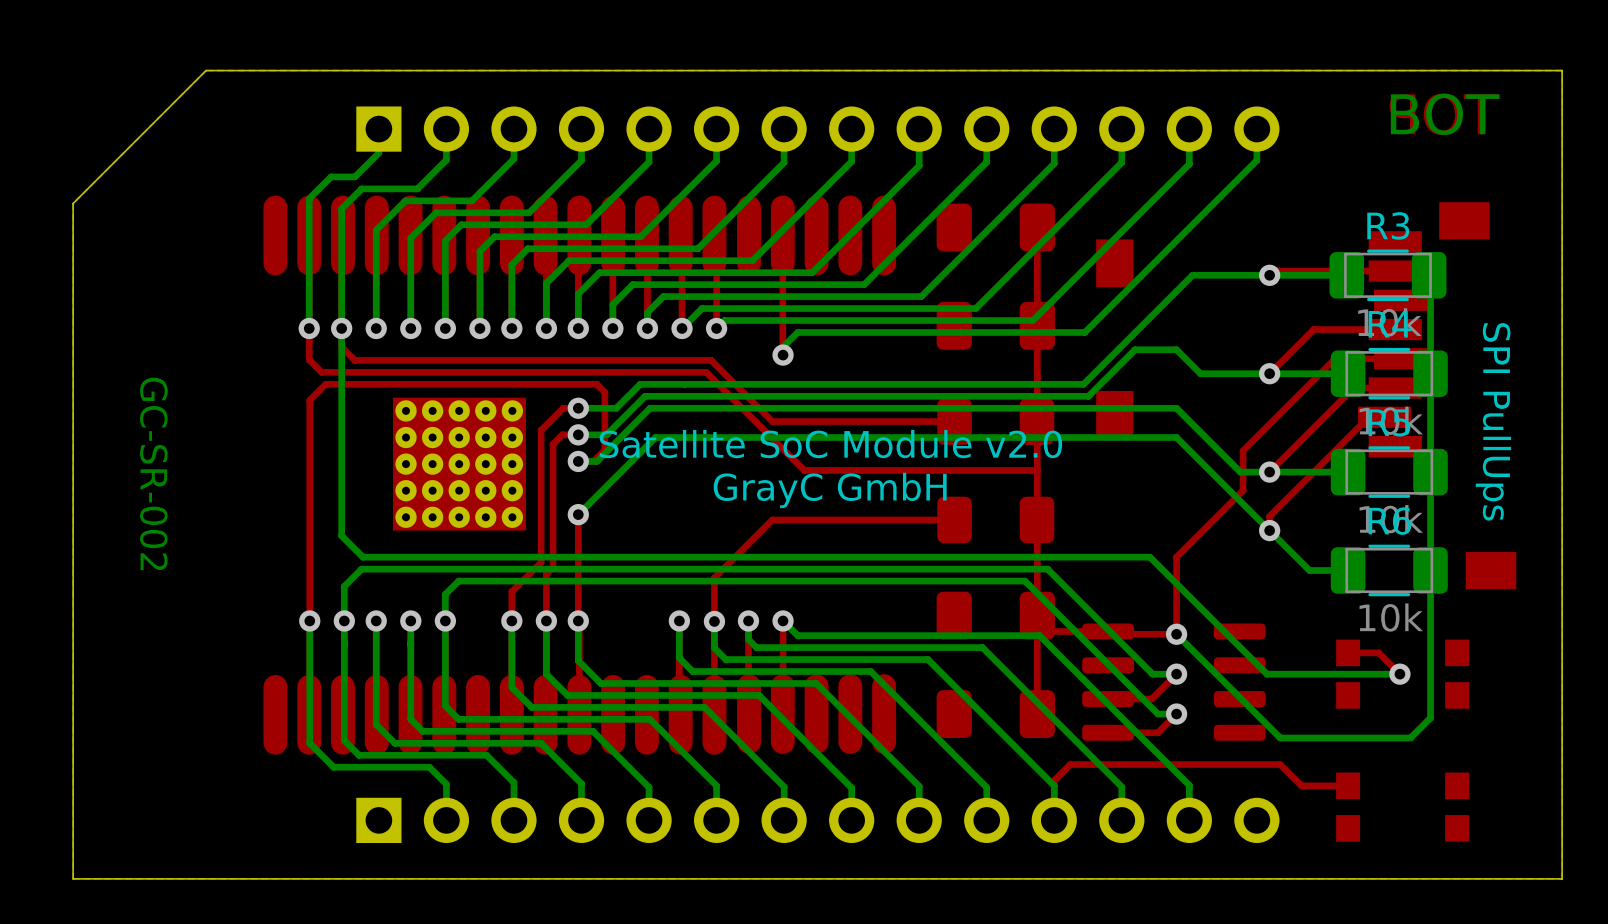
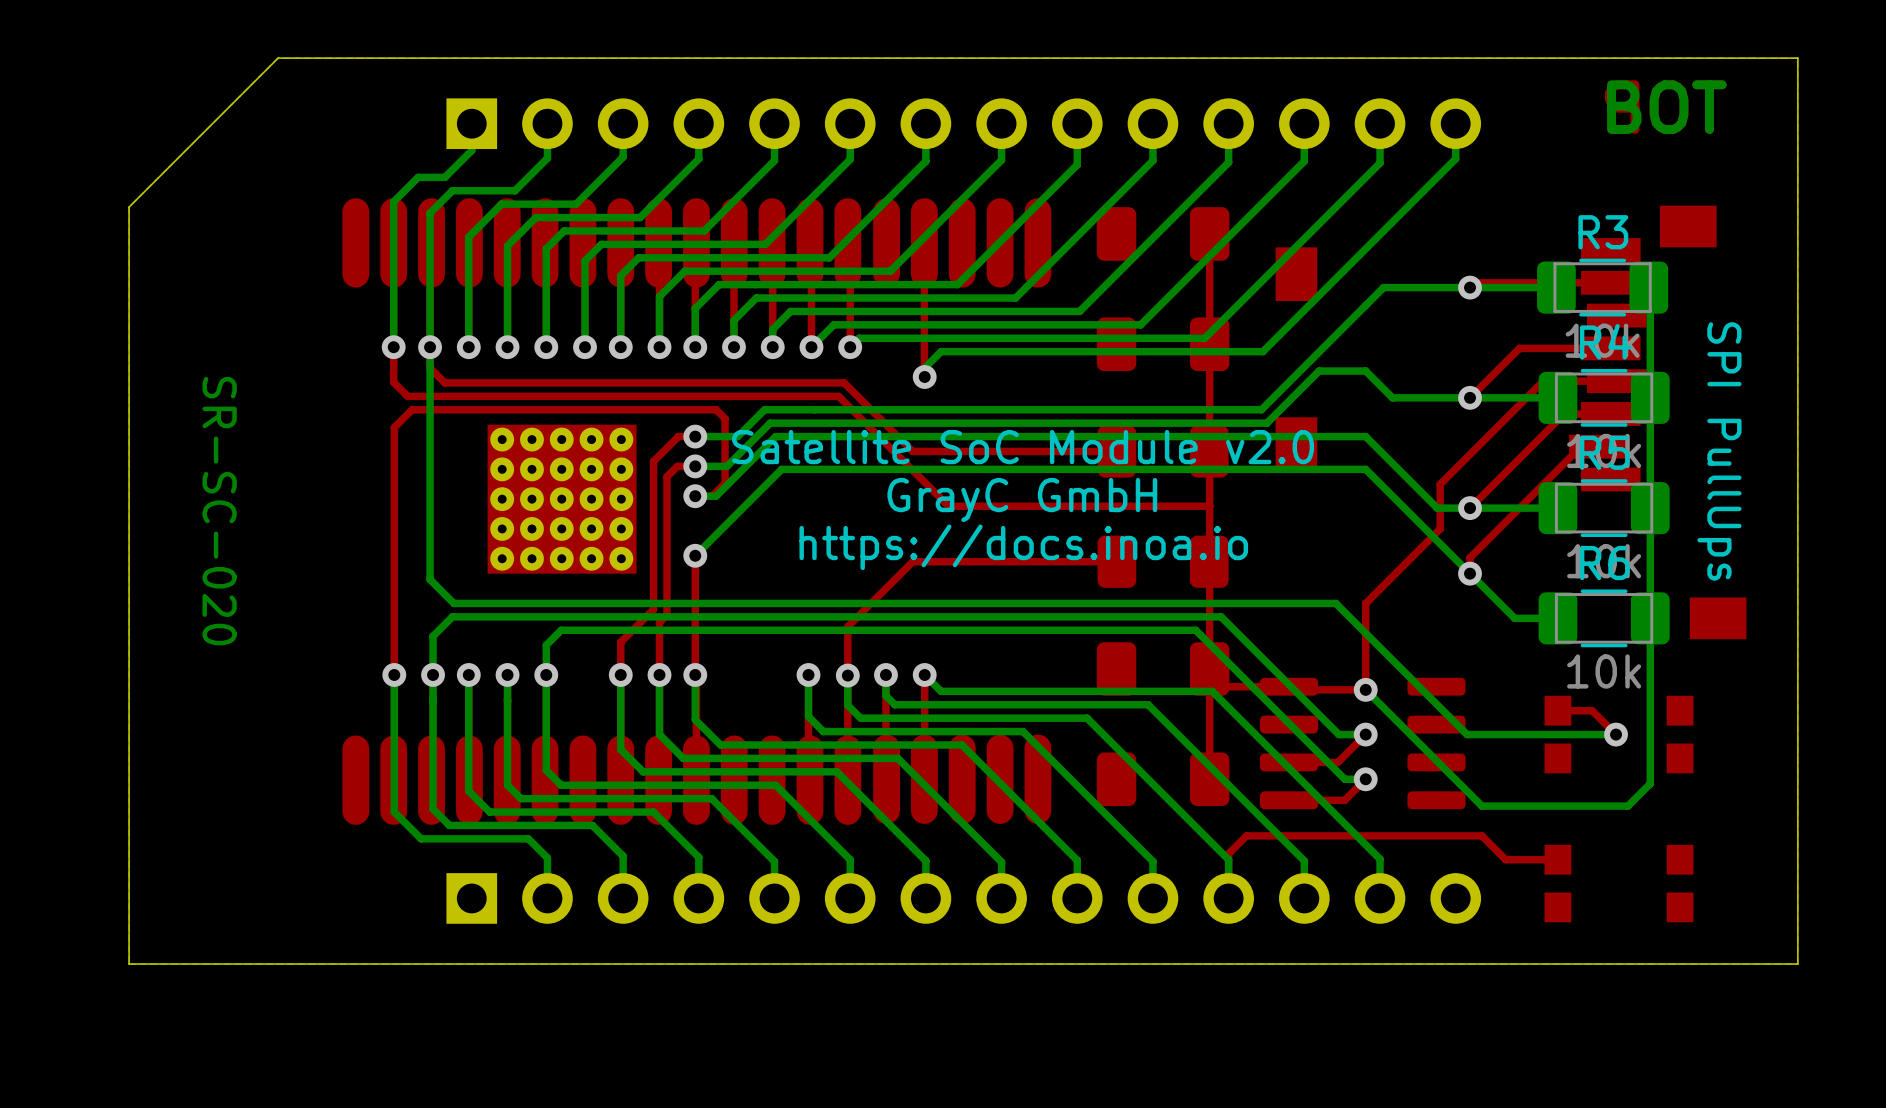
text position: Satellite SoC Module v2.0 (830, 444) -> Satellite SoC Module v2.0 (1023, 447)
text: GC-SR-002 (153, 473) -> SR-SC-020 (219, 511)
text position: GrayC GmbH (830, 490) -> GrayC GmbH (1022, 500)
text: none -> https://docs.inoa.io (1023, 547)

